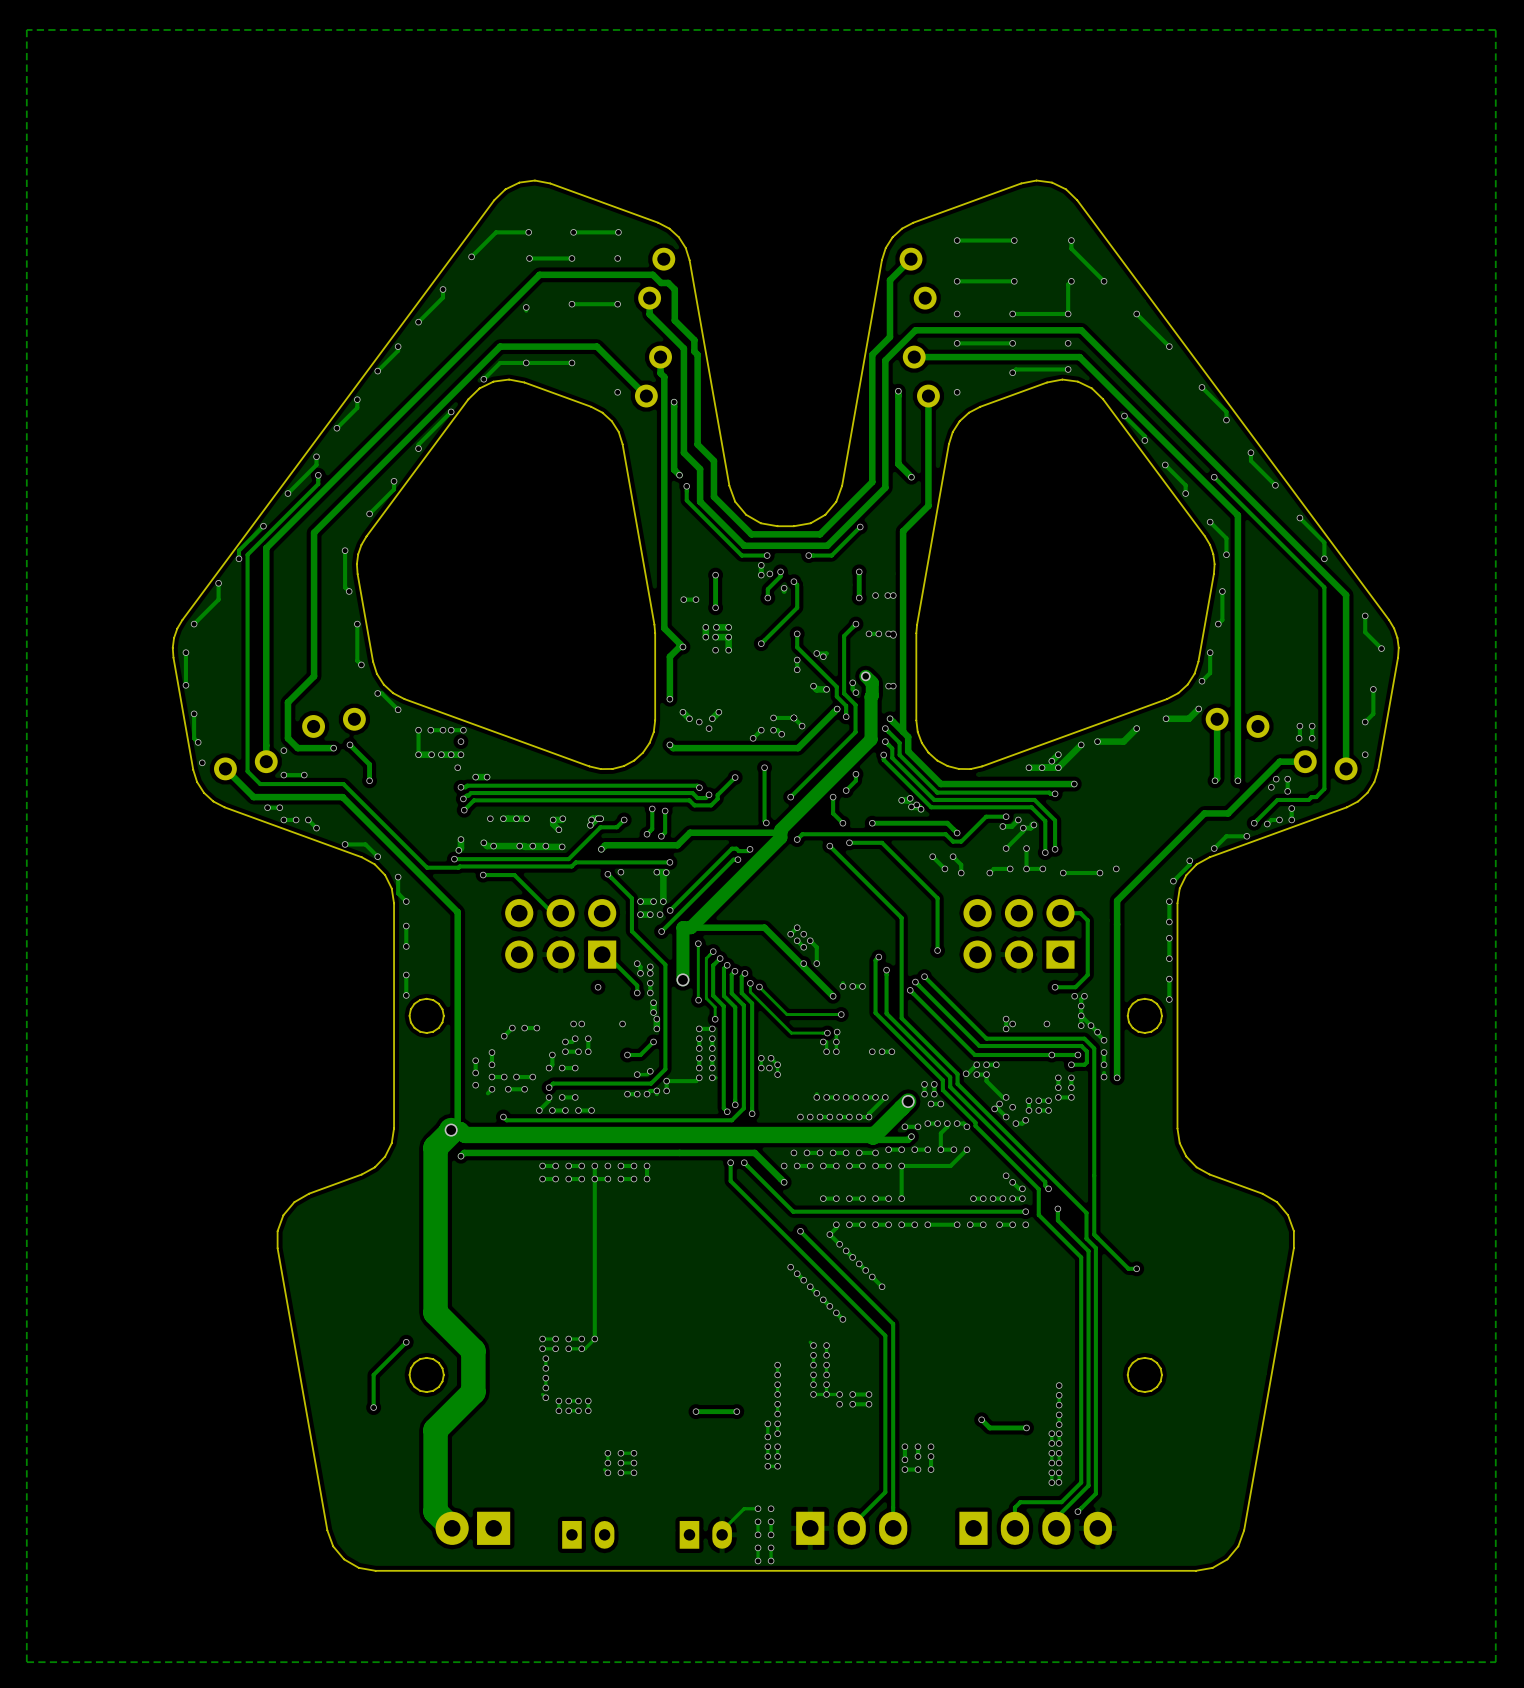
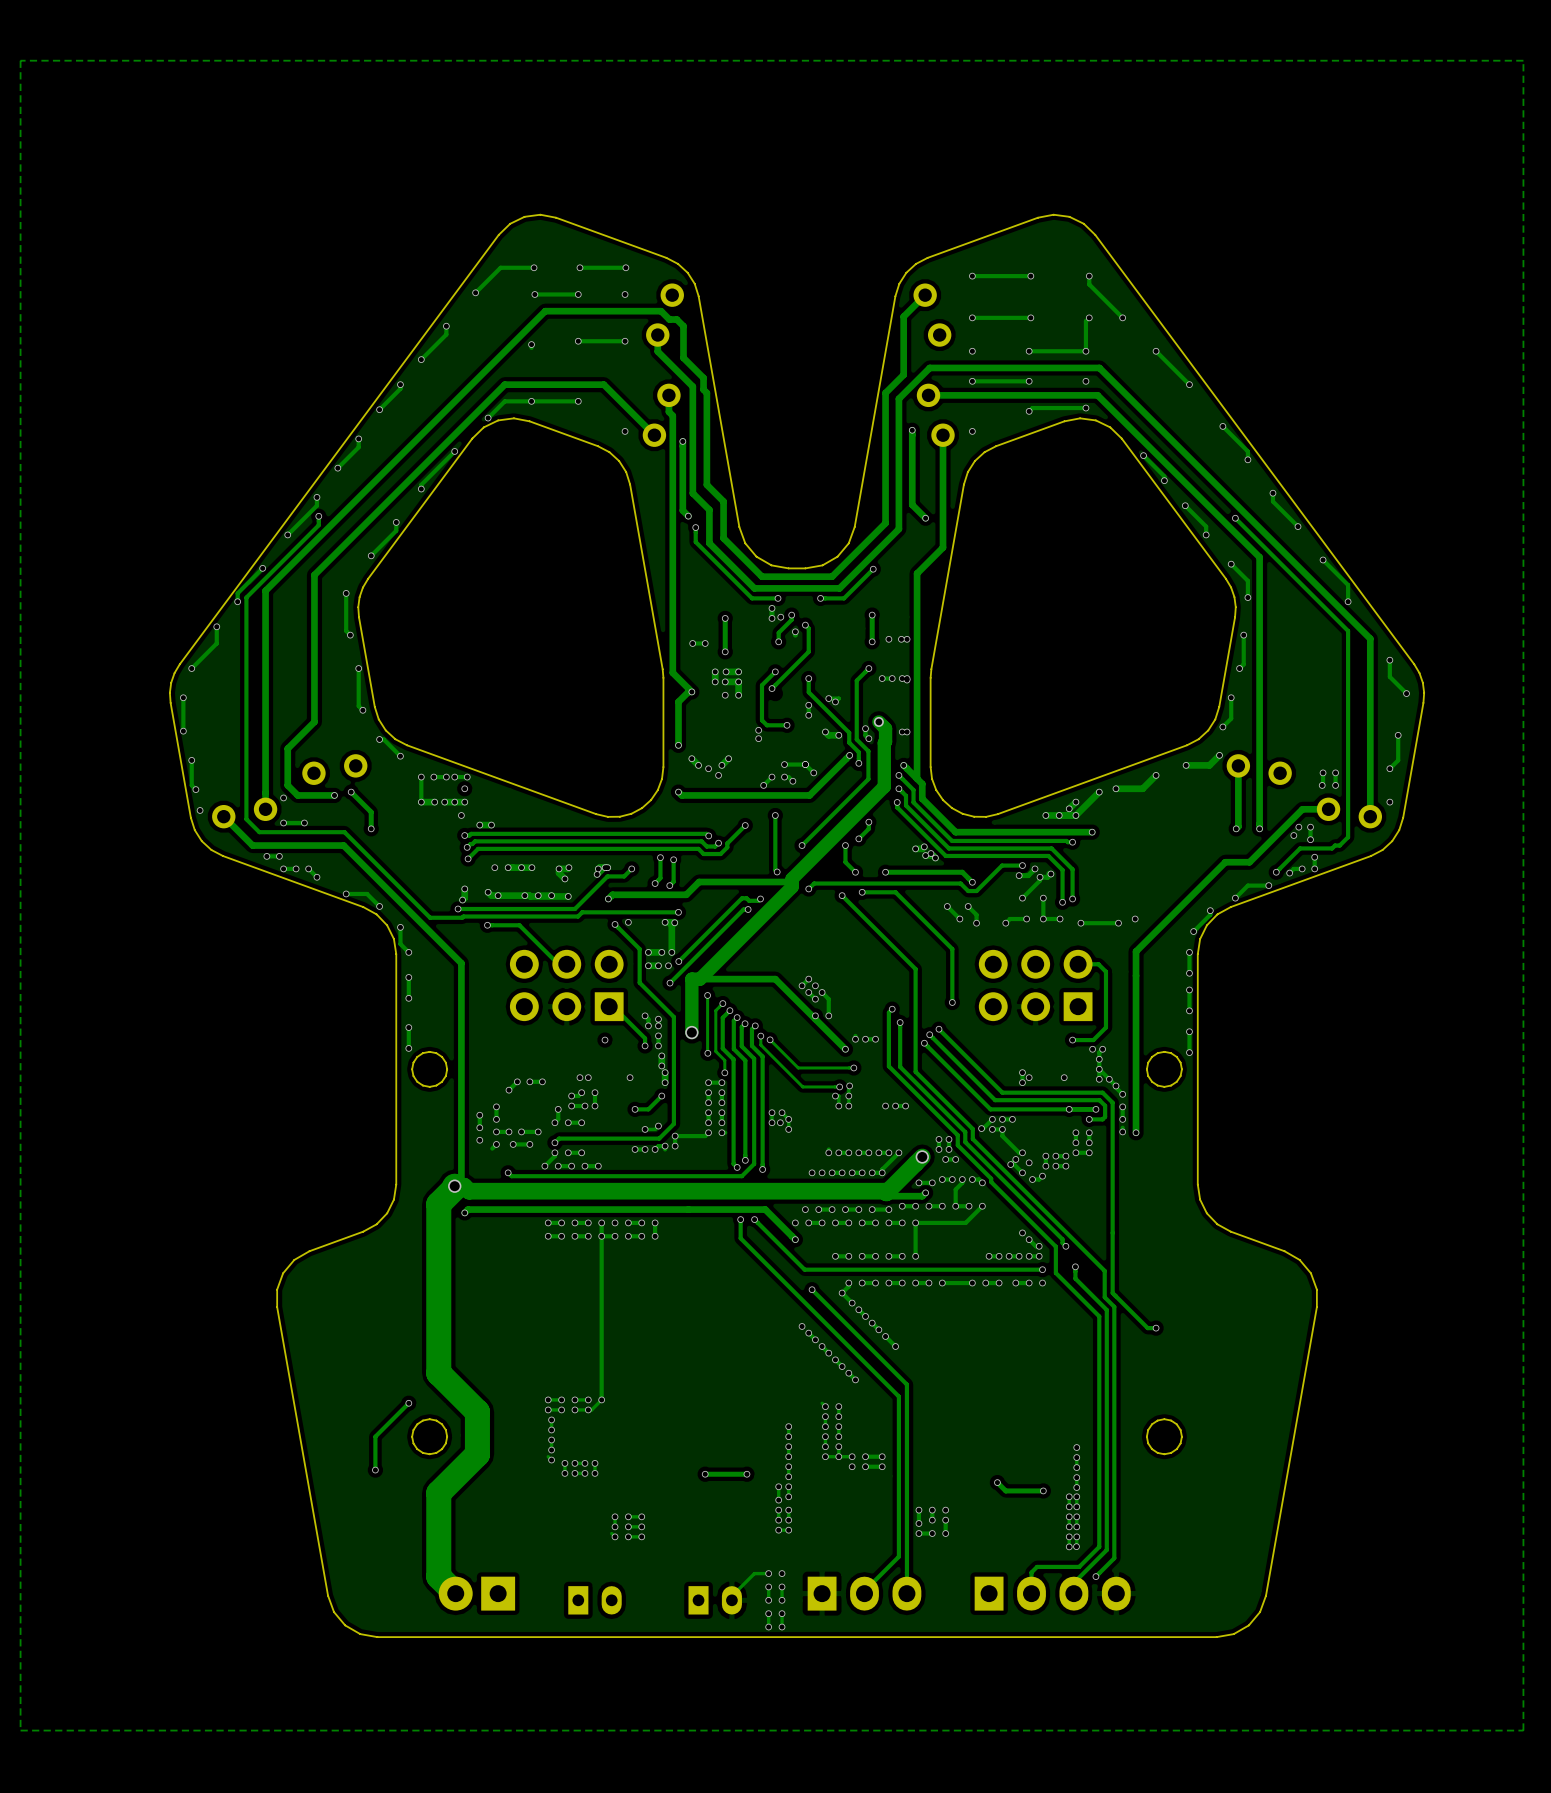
track: none -> (775, 671) (761, 685) (761, 720) (766, 725) (787, 725)
via: none -> (775, 671)
via: none -> (787, 725)
via: none -> (758, 730)
via: none -> (758, 738)

